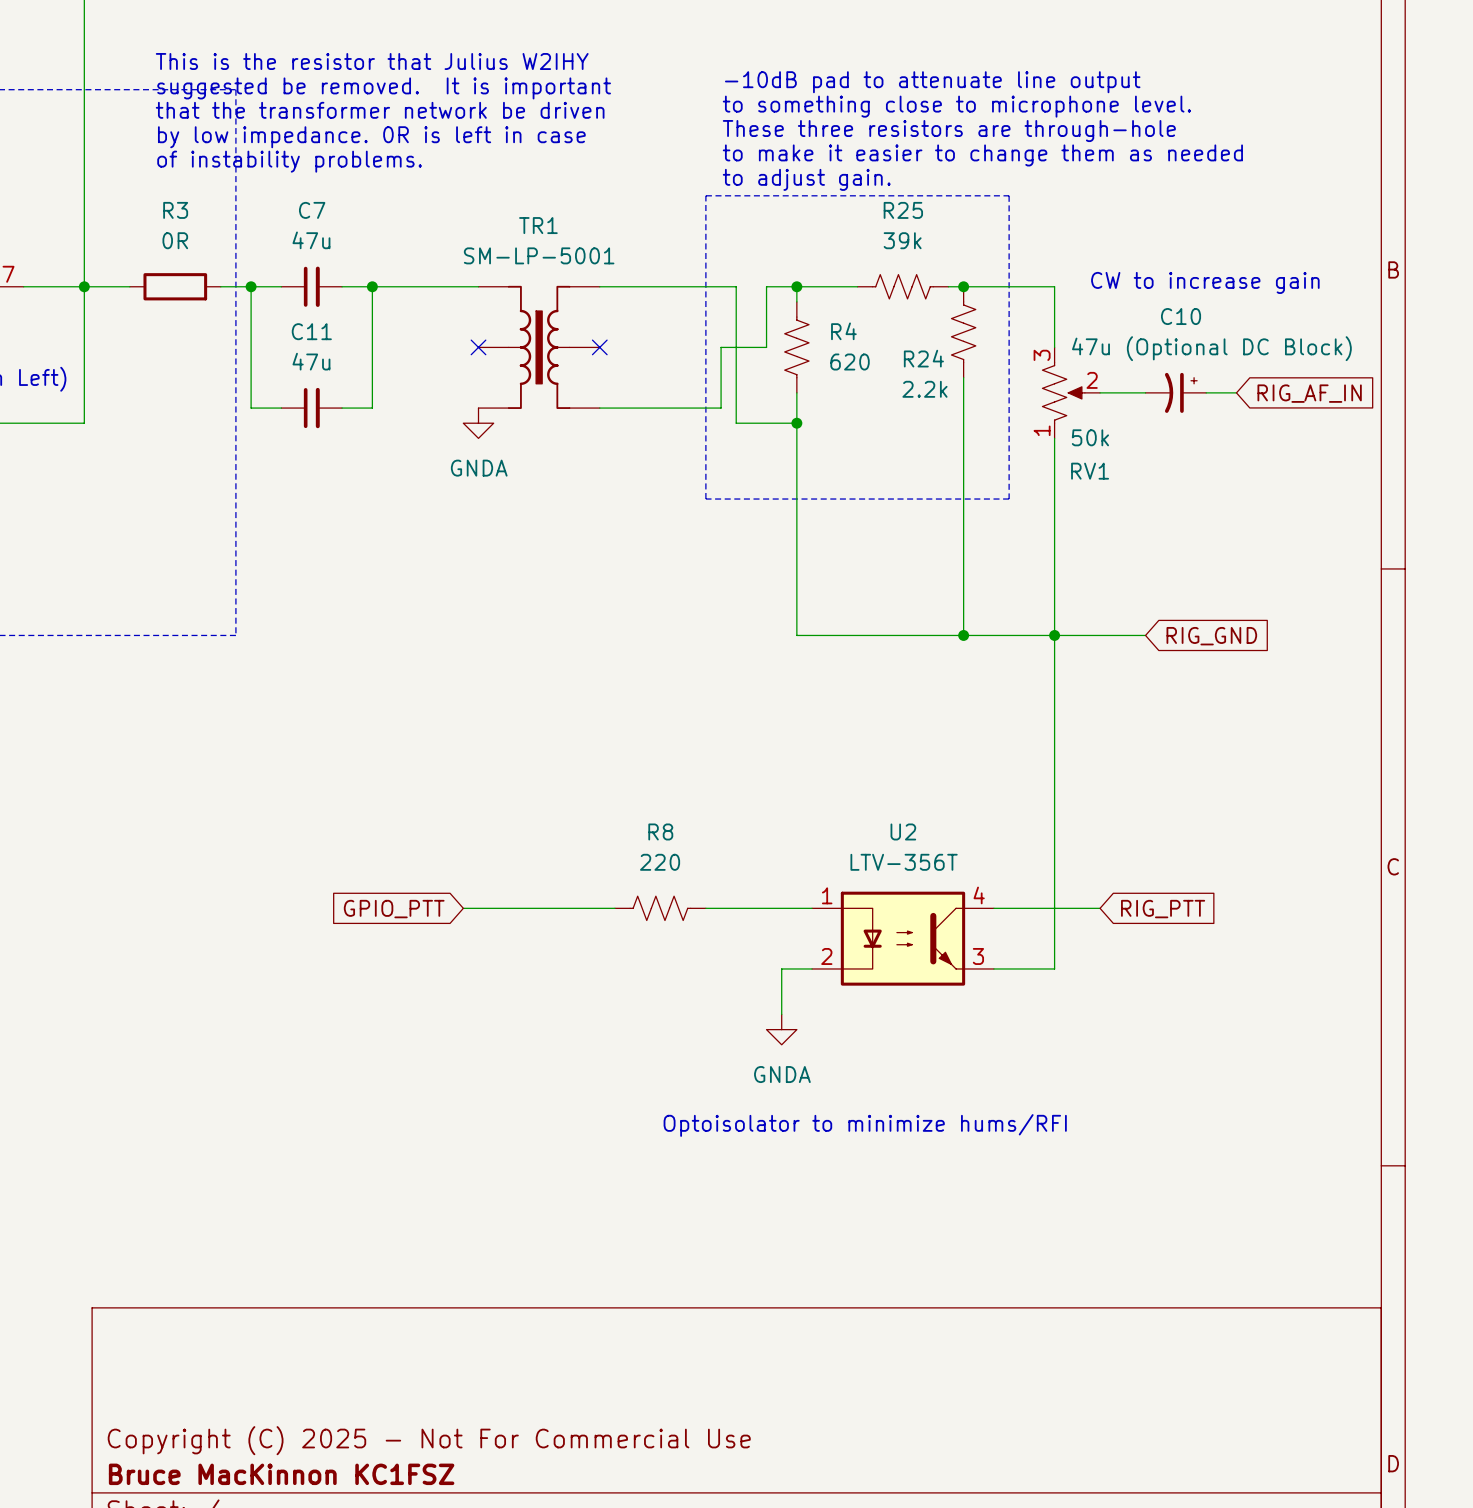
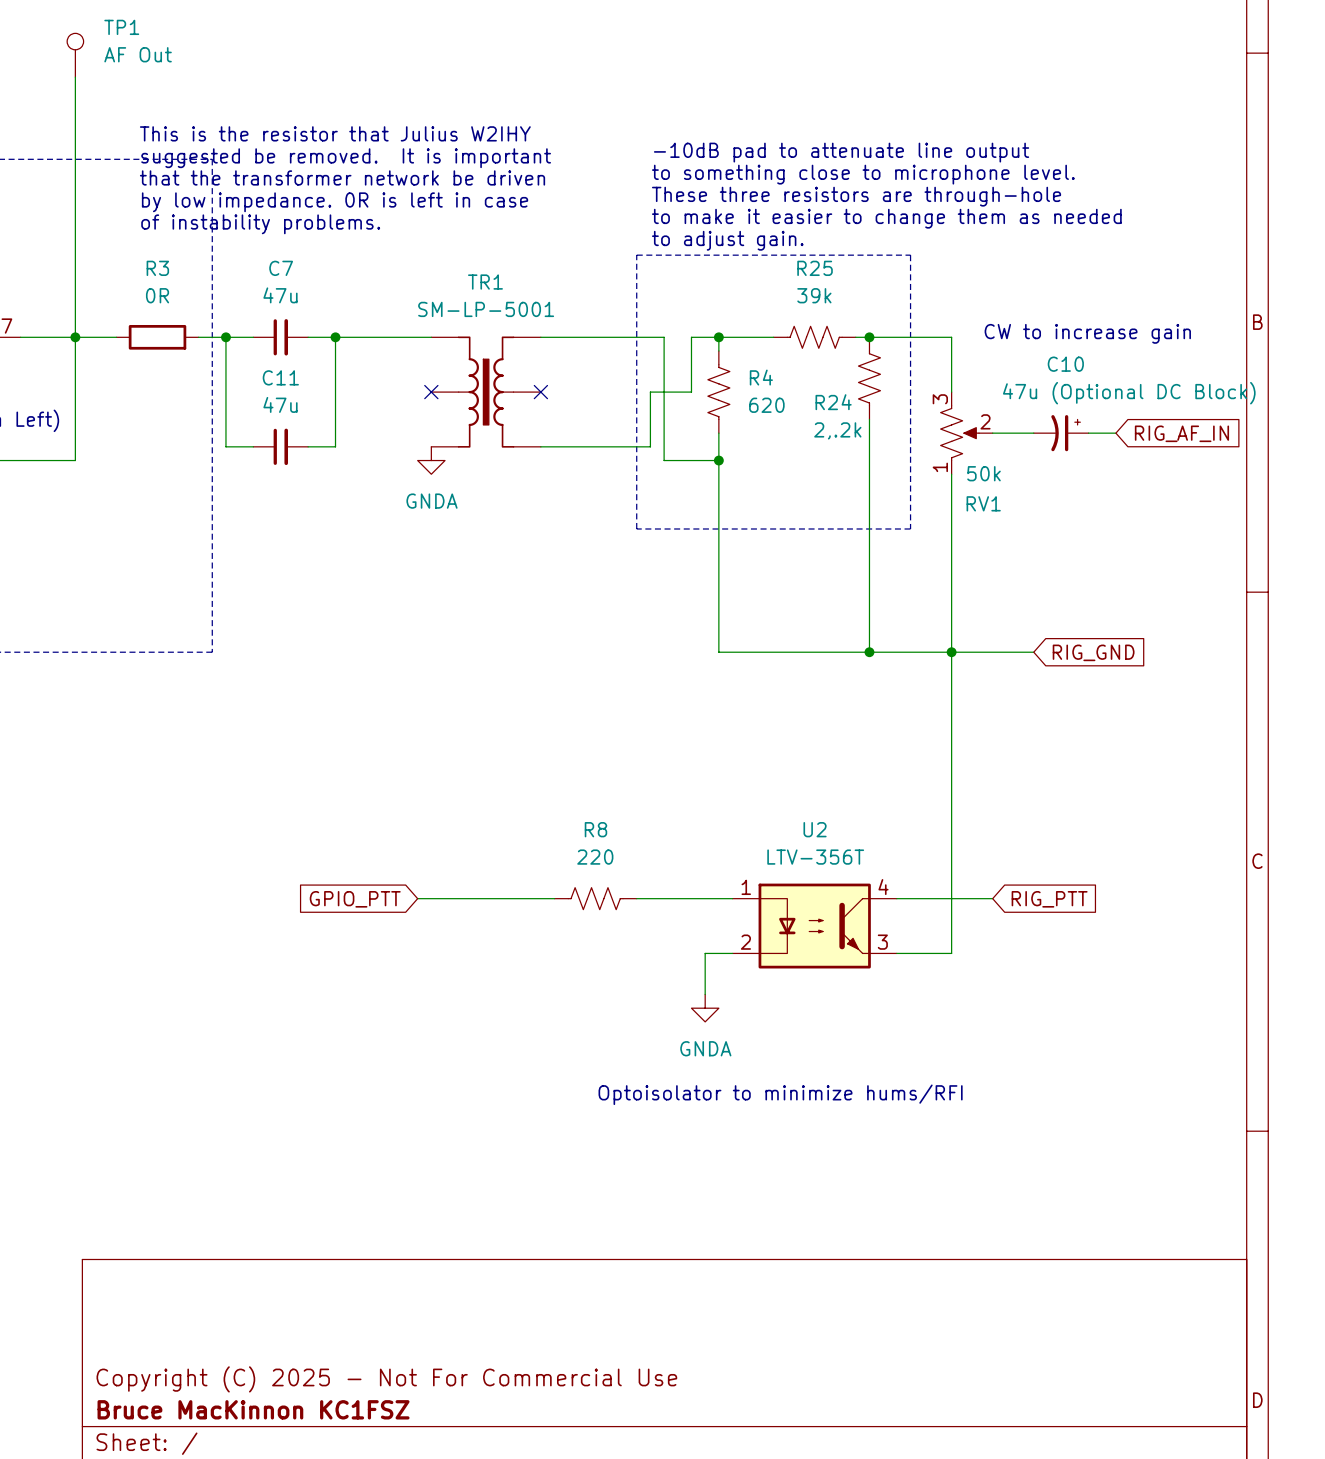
C10 value position: 47u (Optional DC Block) (1211, 348) -> 47u (Optional DC Block) (1129, 393)
R24 value: 2.2k (924, 389) -> 2,.2k (837, 430)

